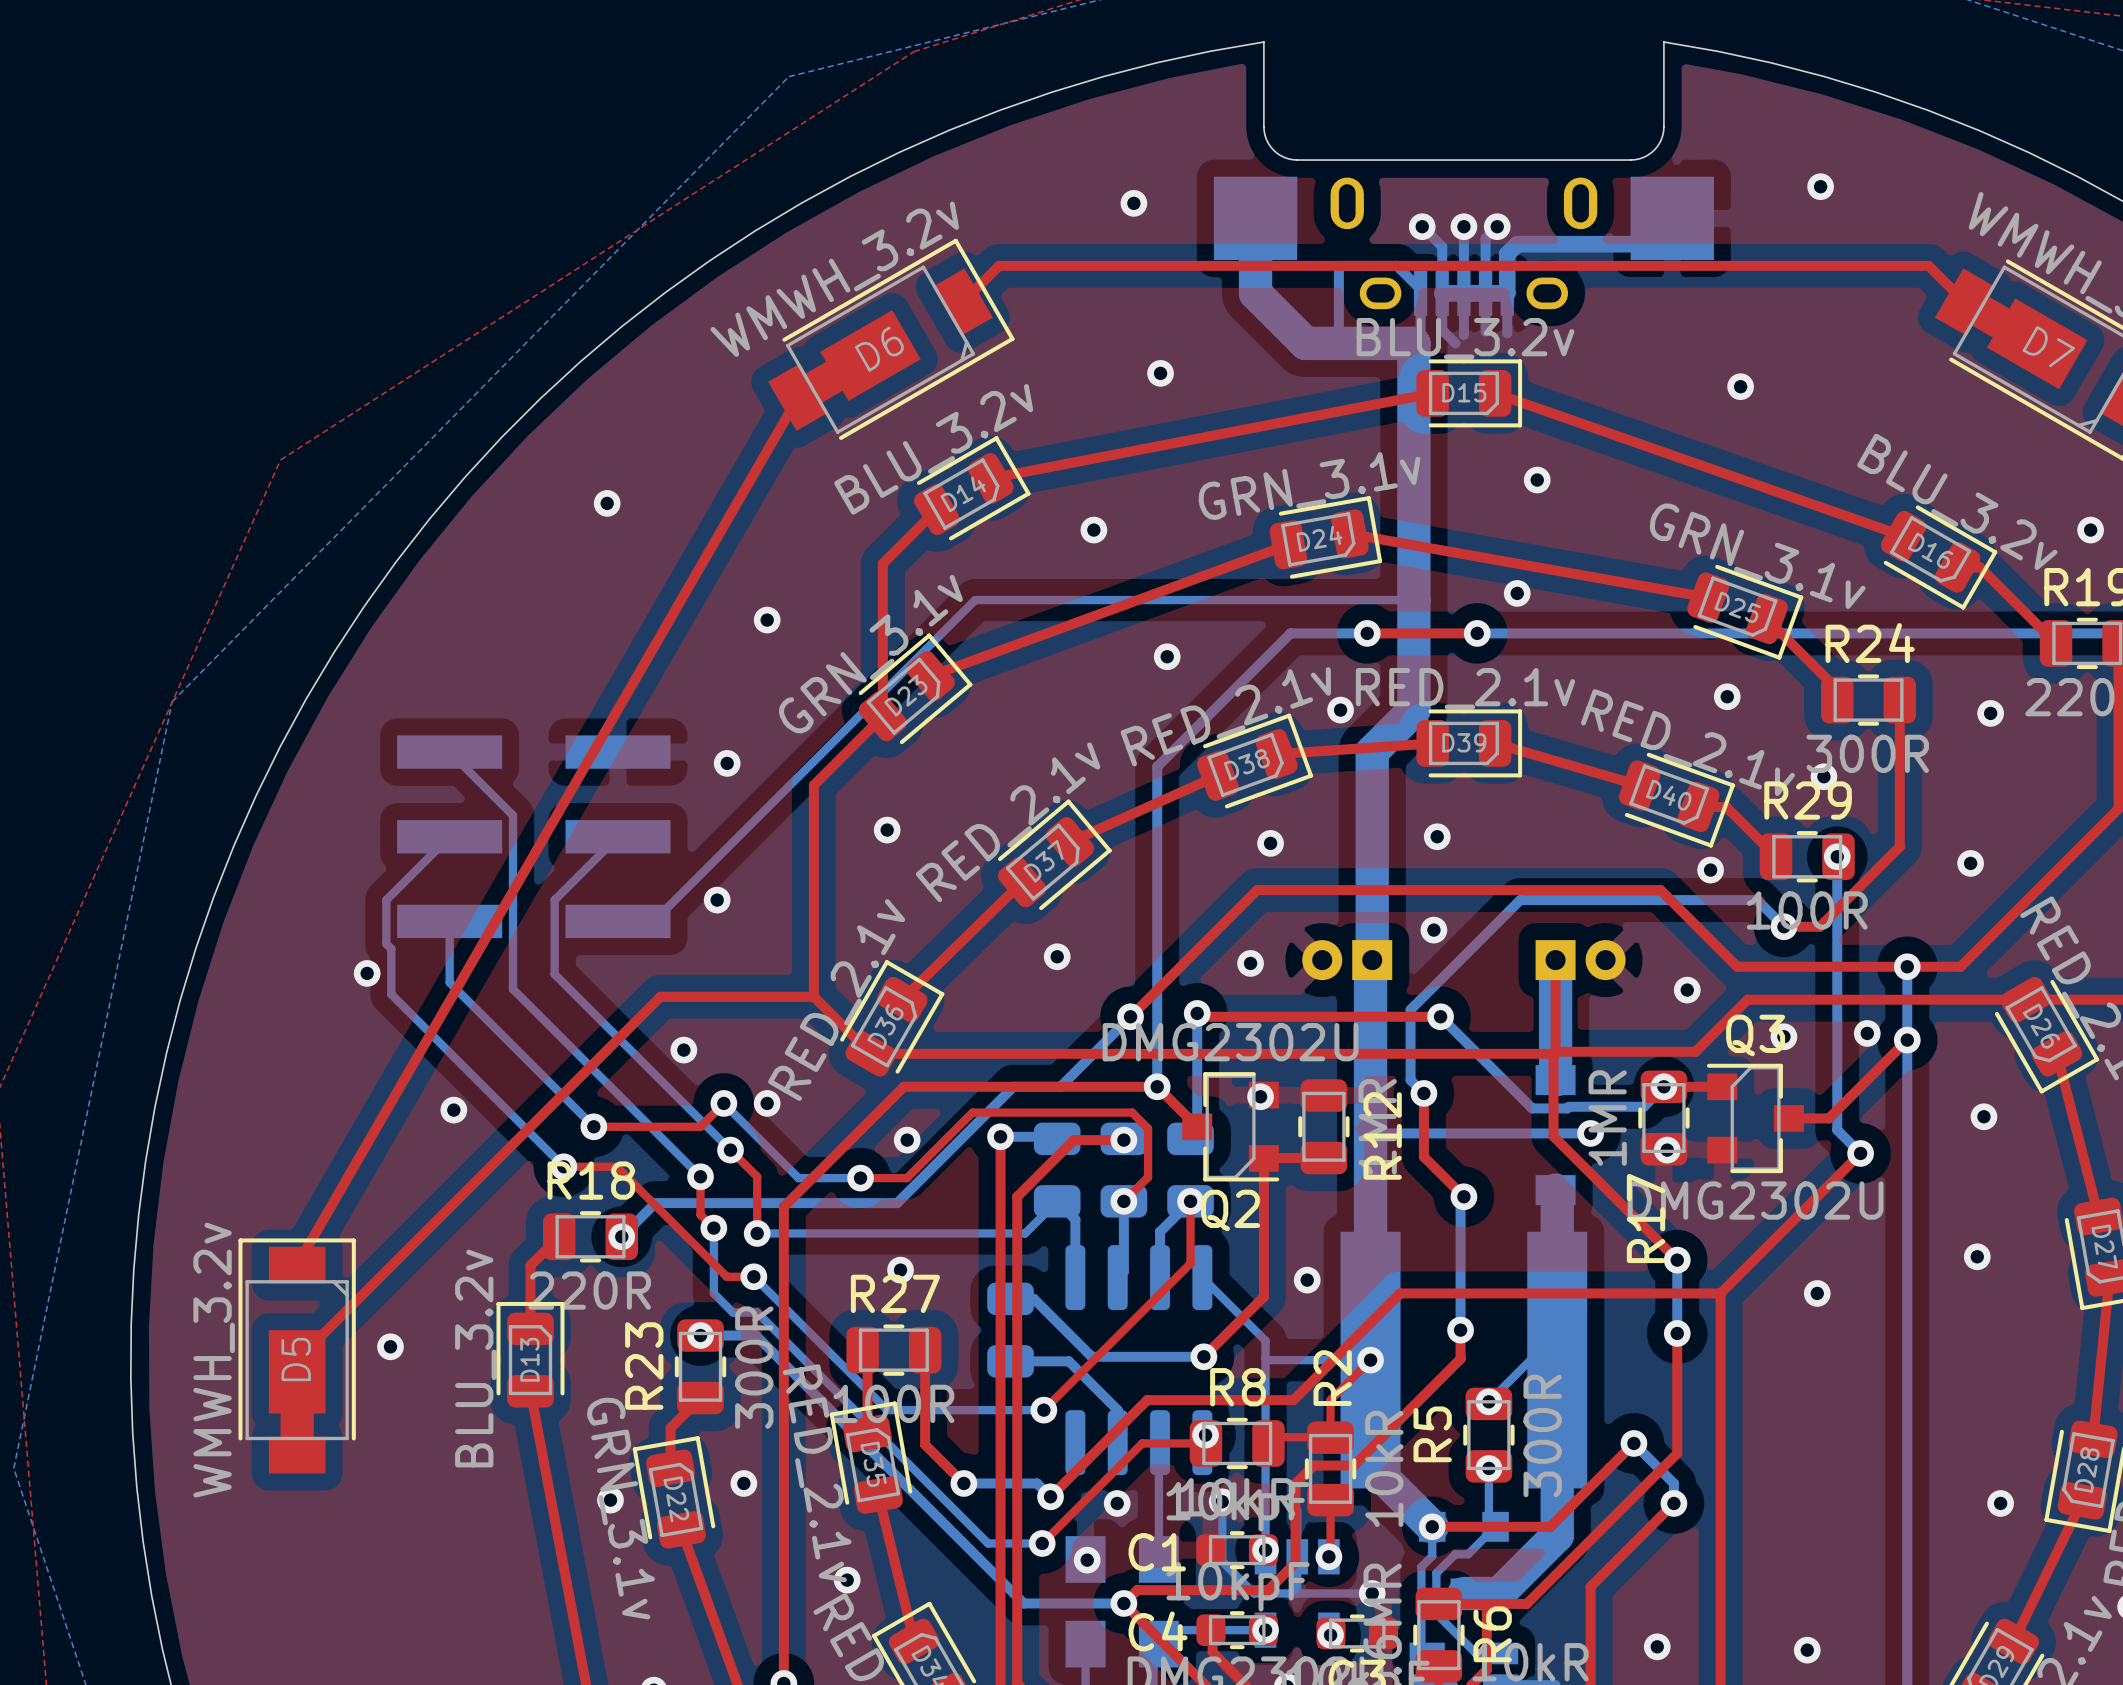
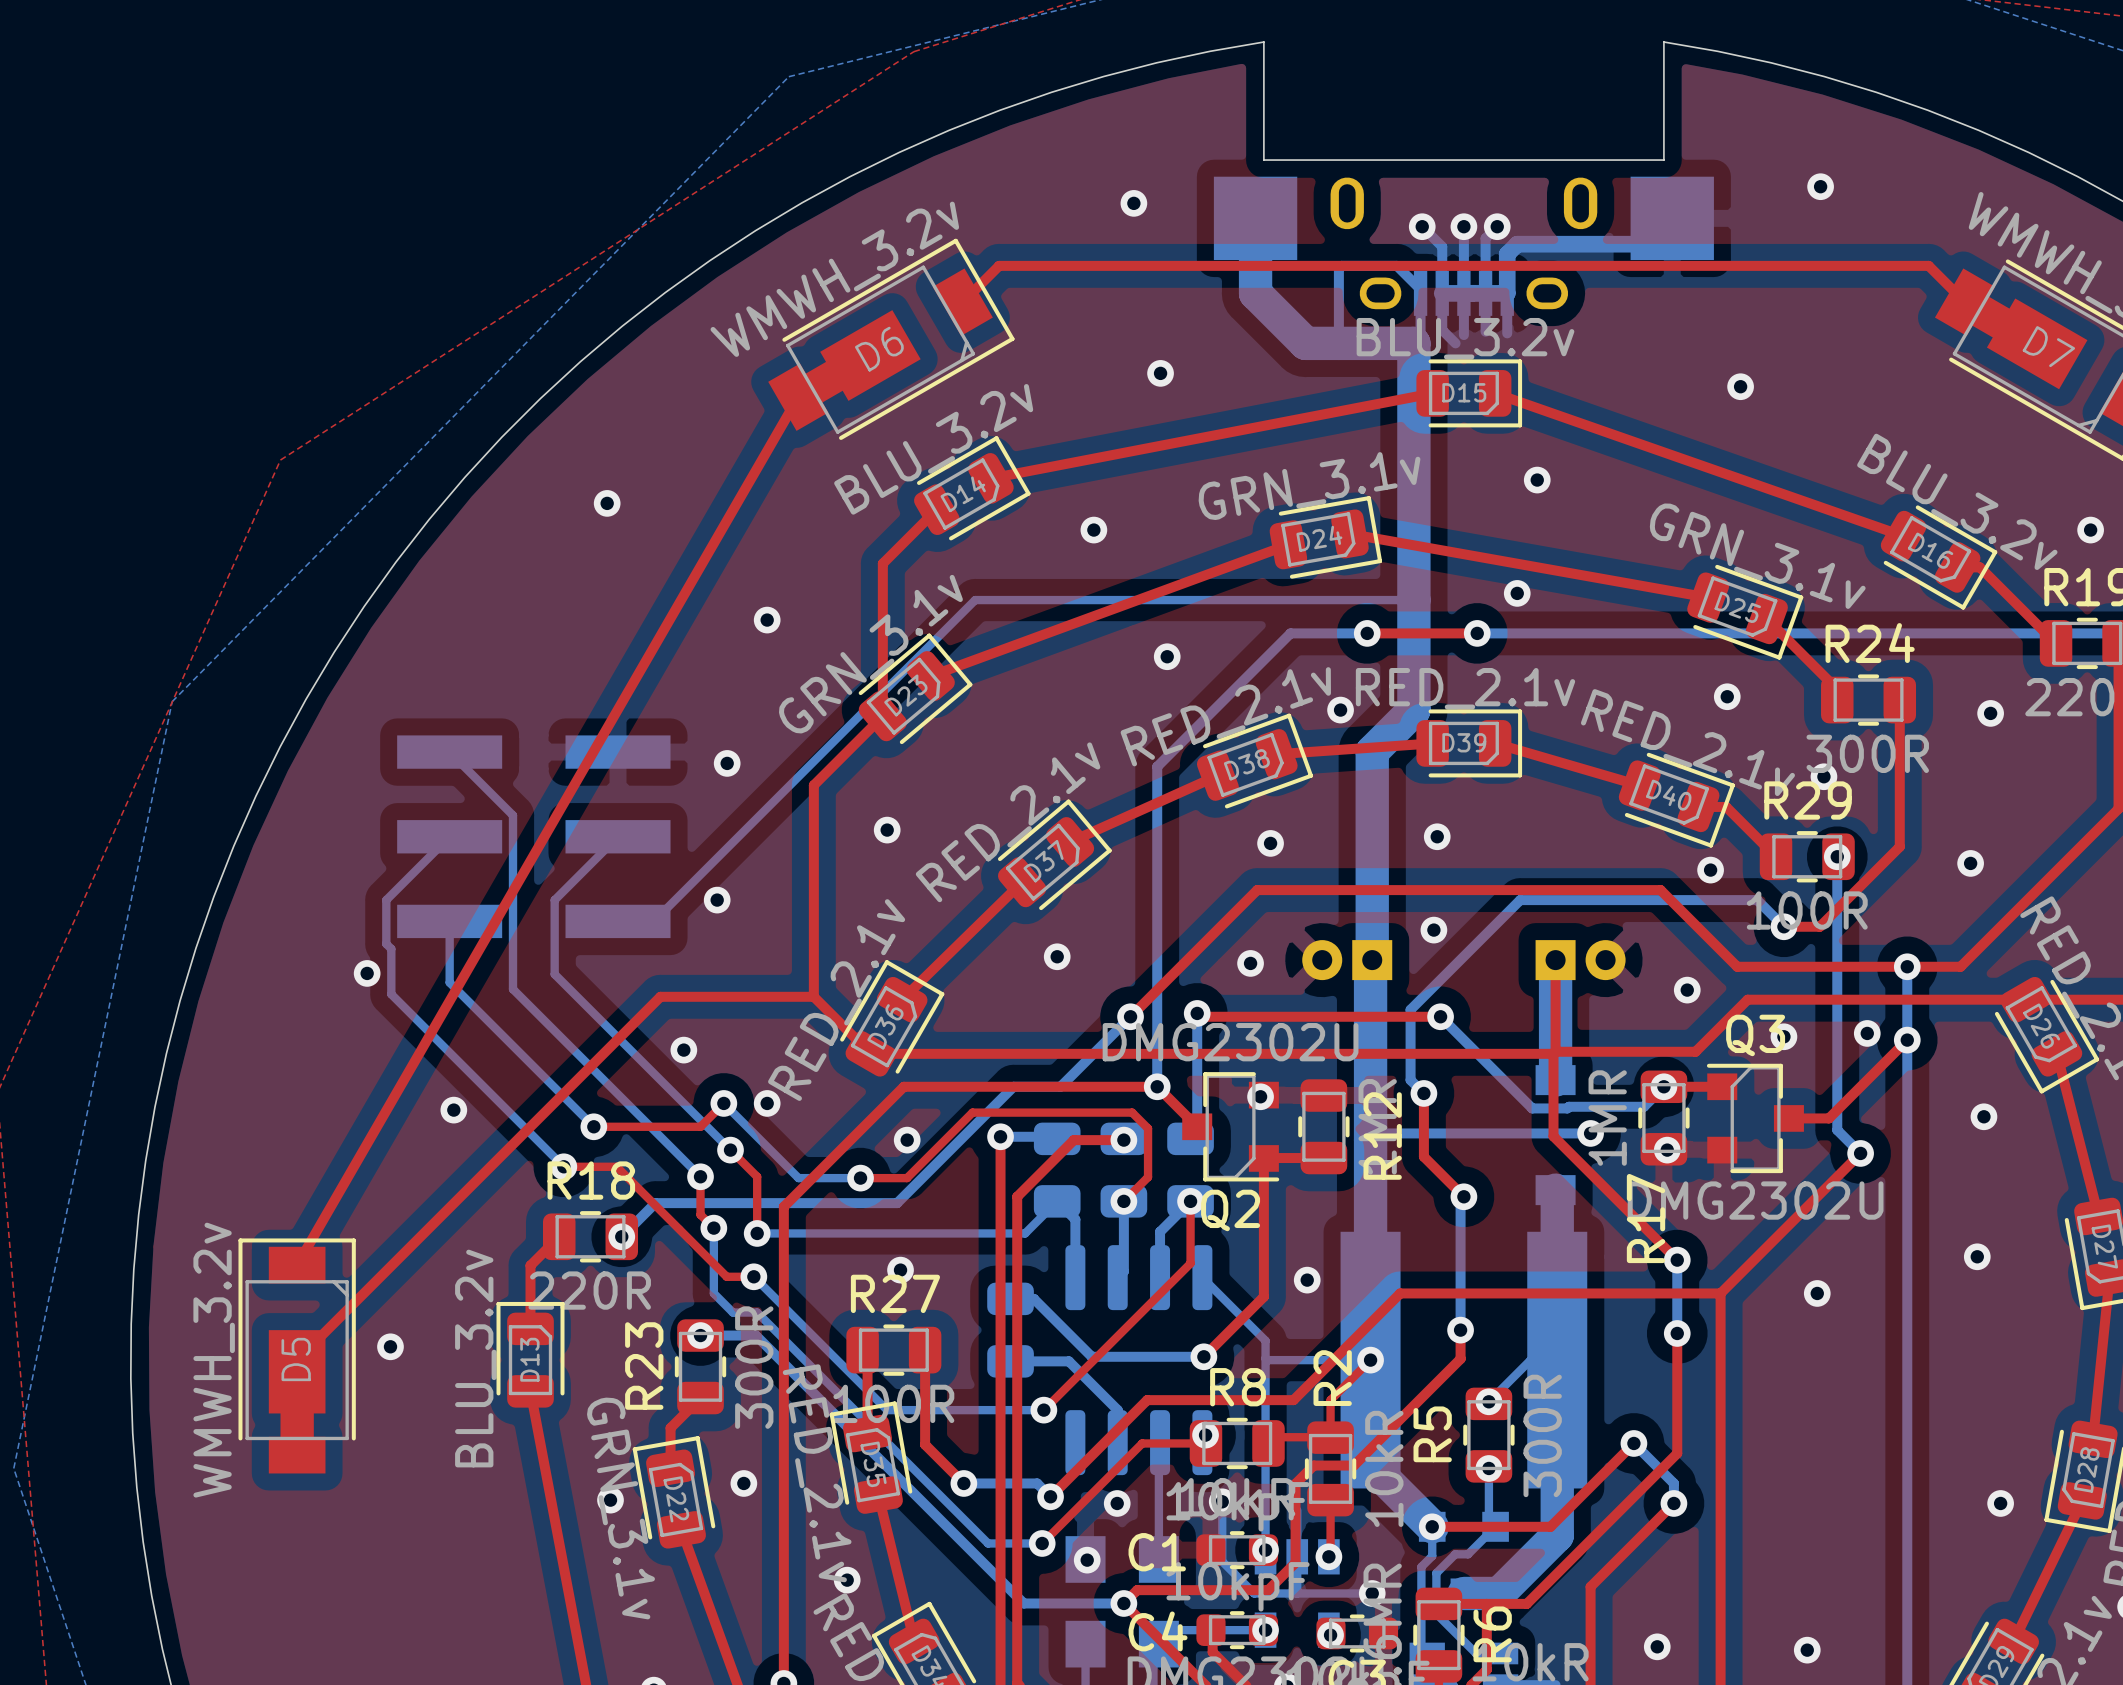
board edge: (1263, 126) (1266, 139) (1273, 150) (1284, 157) (1297, 160) -> (1263, 126) (1263, 160) (1297, 160)
board edge: (1663, 126) (1661, 139) (1654, 150) (1643, 157) (1630, 160) -> (1663, 126) (1663, 160) (1630, 160)

